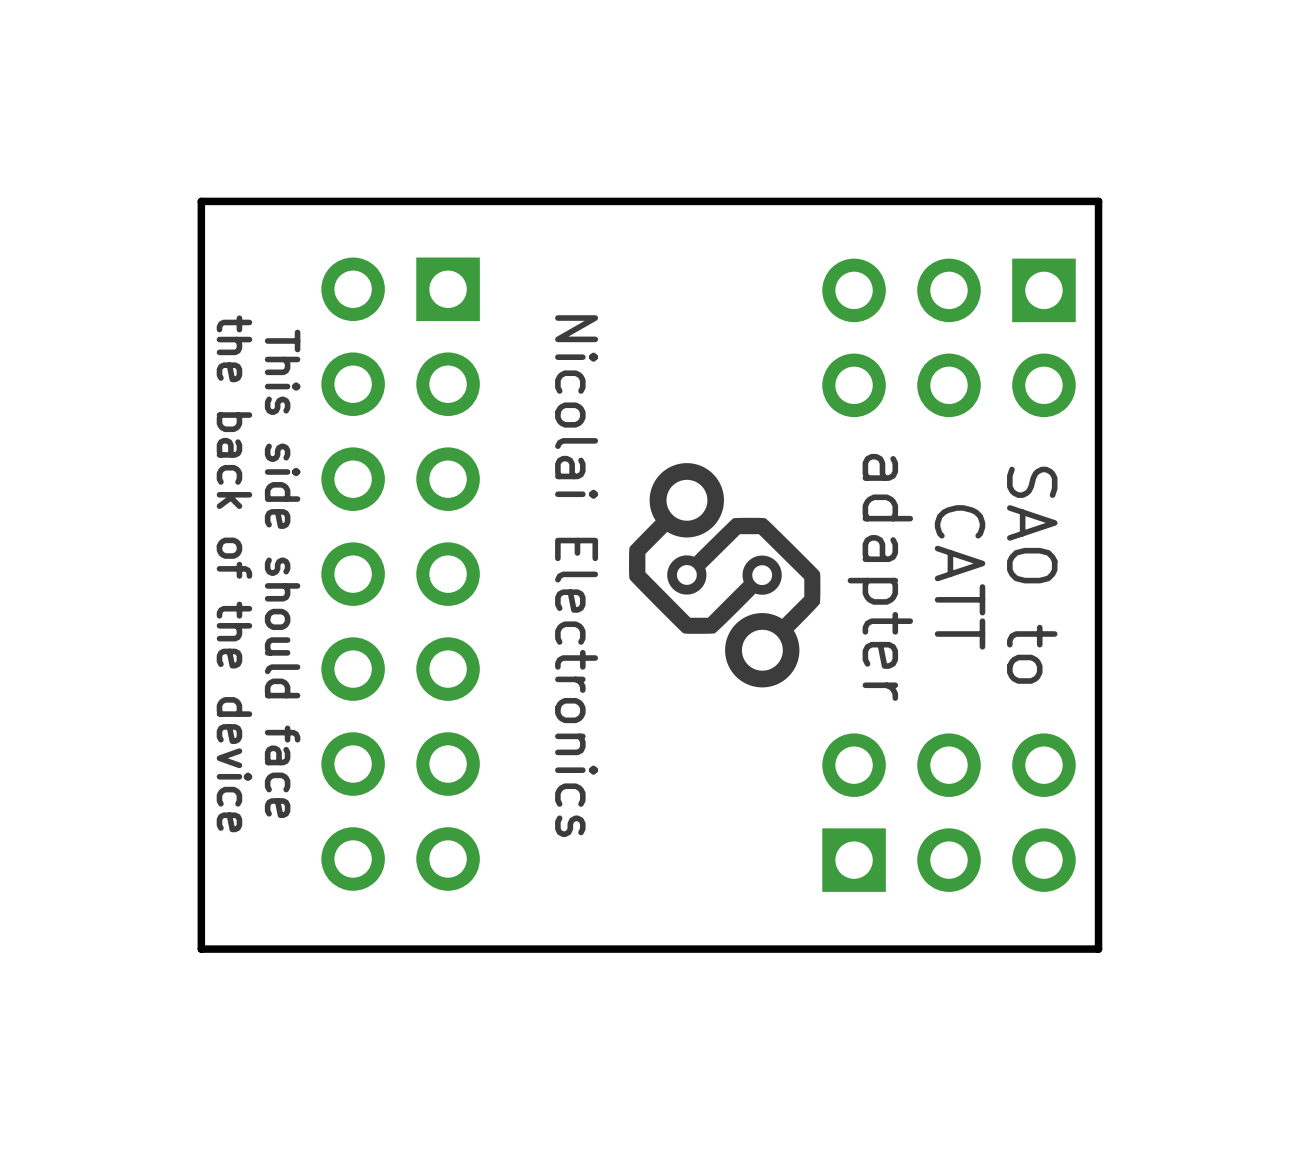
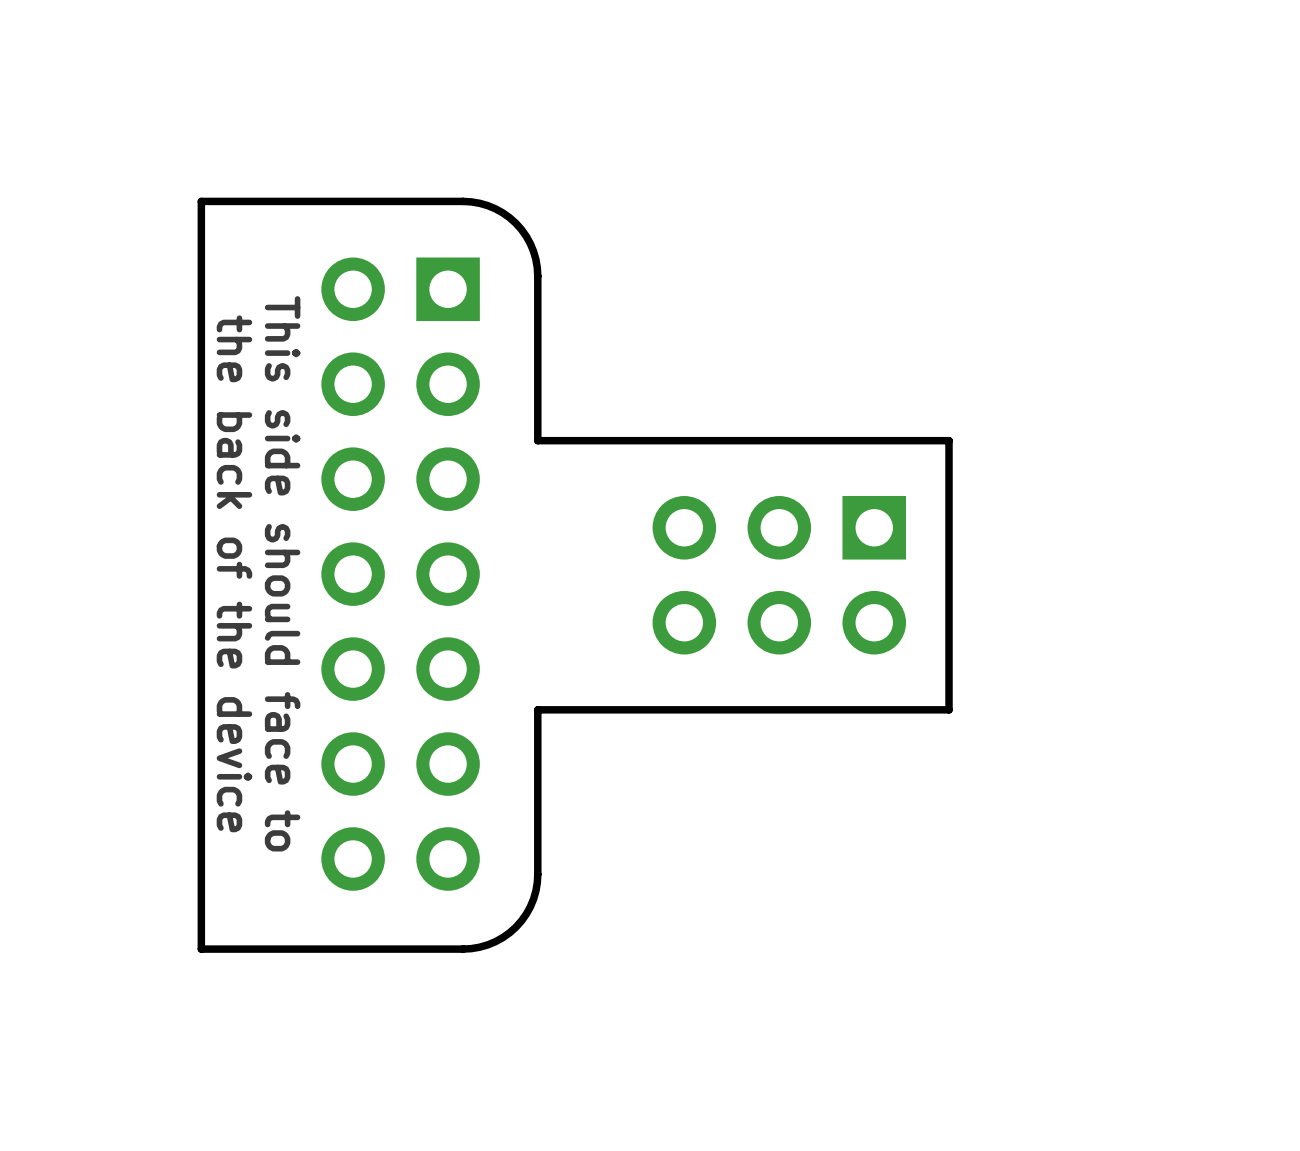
board edge: (463, 201) (1098, 201) (1098, 949) (463, 949) -> (463, 201) (479, 203) (502, 212) (521, 229) (533, 251) (537, 276) (537, 440) (949, 440) (949, 709) (537, 709) (537, 874) (533, 899) (521, 920) (502, 937) (487, 944) (463, 949)
part: (949, 337) -> none
drawing: [629, 463, 821, 688] -> none
text: This side should face (282, 573) -> This side should face to (282, 573)
part: none -> (779, 575)
text: SAO to (1032, 575) -> none
text: Nicolai Electronics (576, 576) -> none
text: adapter (880, 577) -> none
text: CATT (960, 577) -> none
part: (949, 812) -> none

